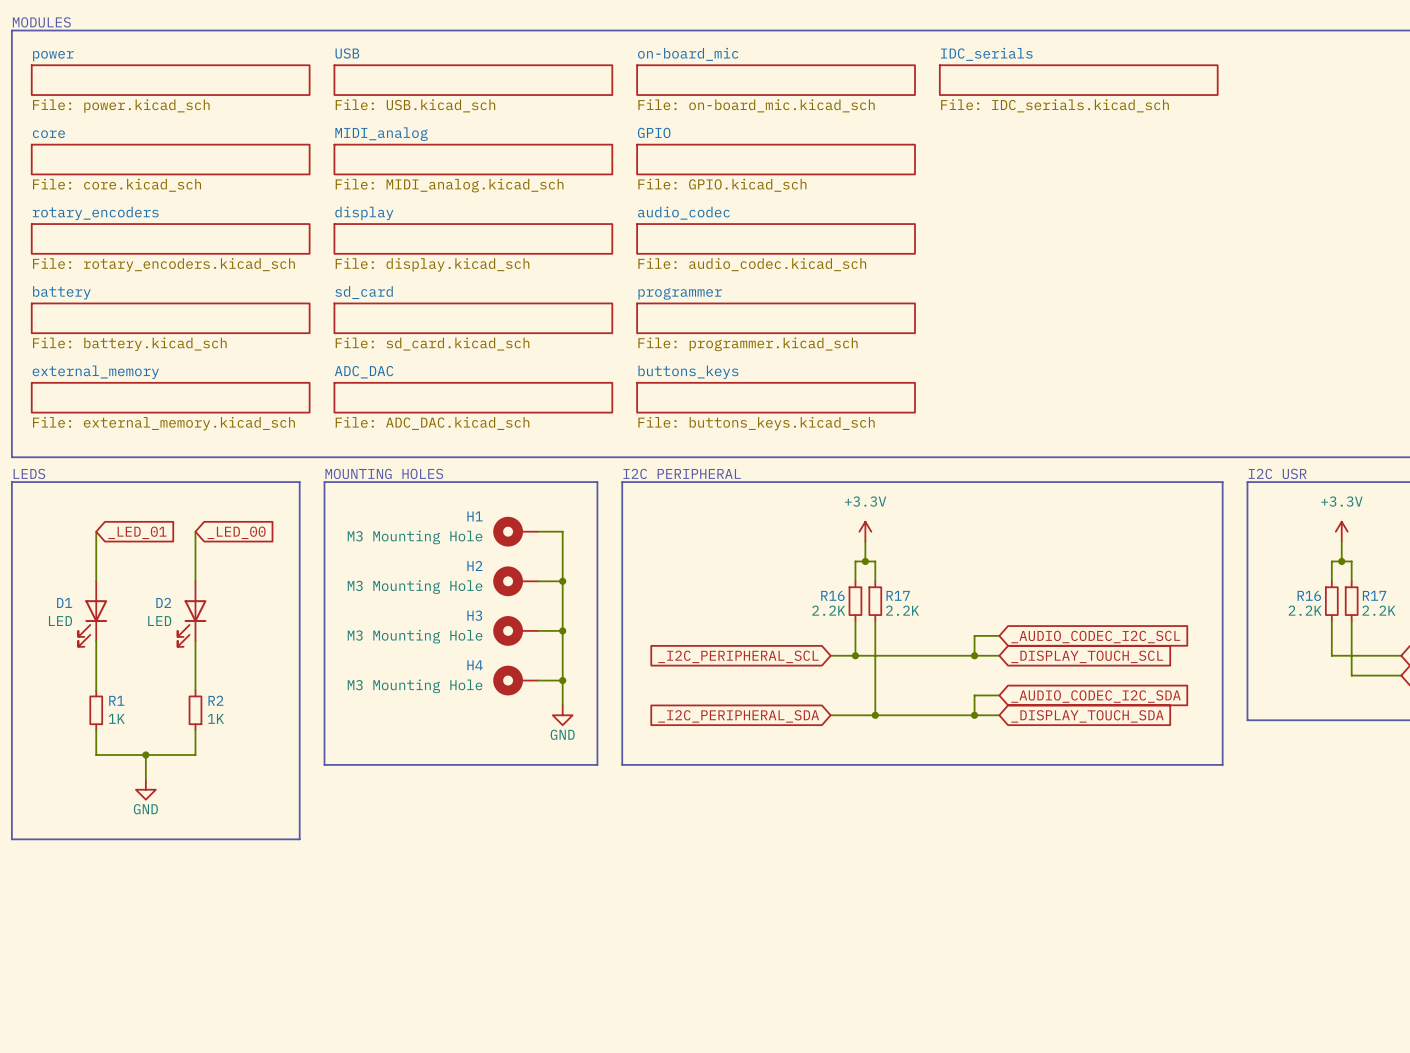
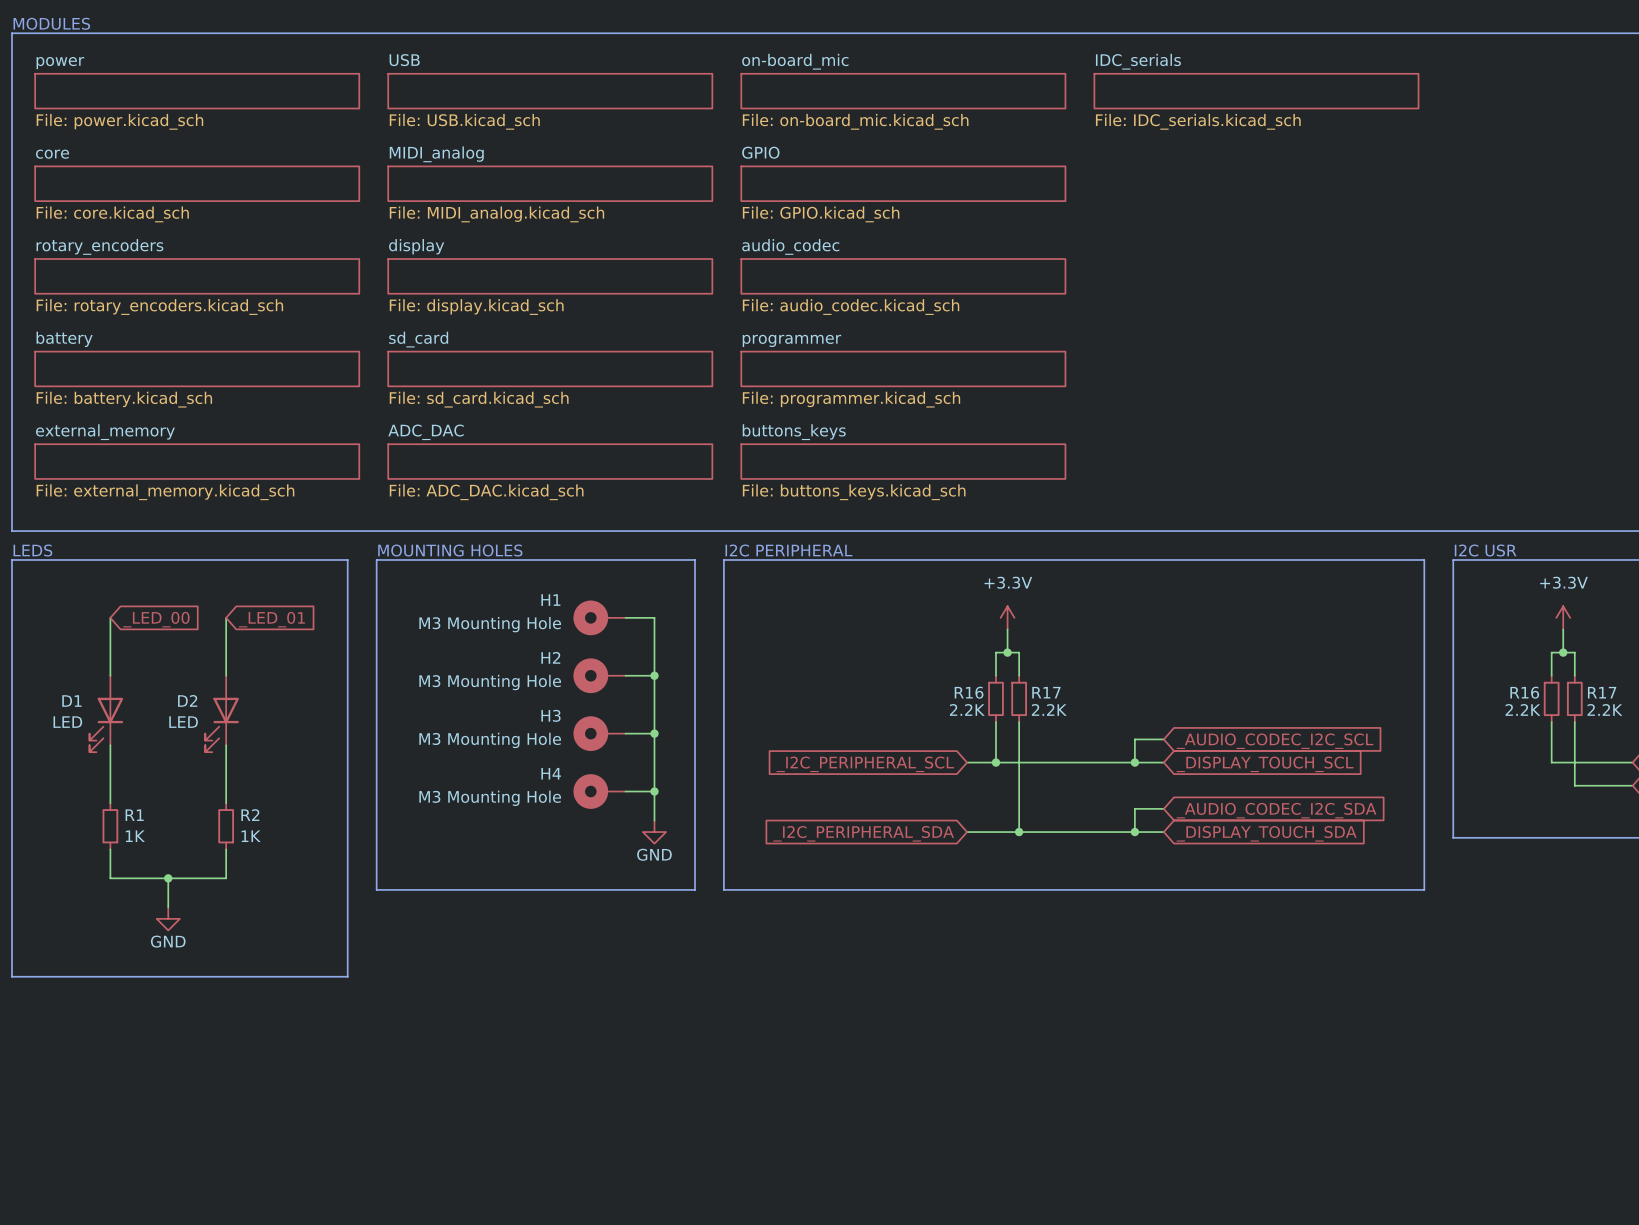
global label: _LED_01 (137, 532) -> _LED_00 (156, 619)
global label: _LED_00 (236, 532) -> _LED_01 (271, 619)

